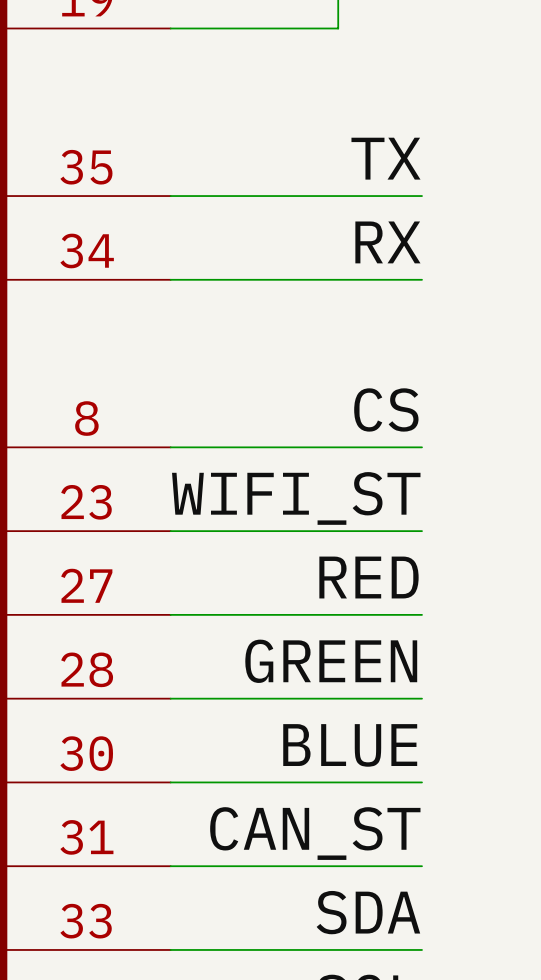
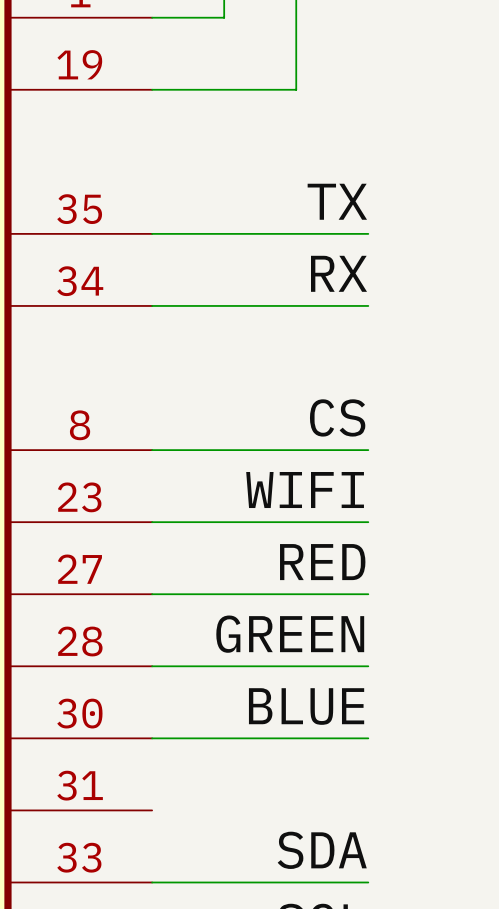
label: WIFI_ST (296, 498) -> WIFI (305, 490)
label: CAN_ST (315, 833) -> none
wire: (170, 866) (421, 866) -> none

